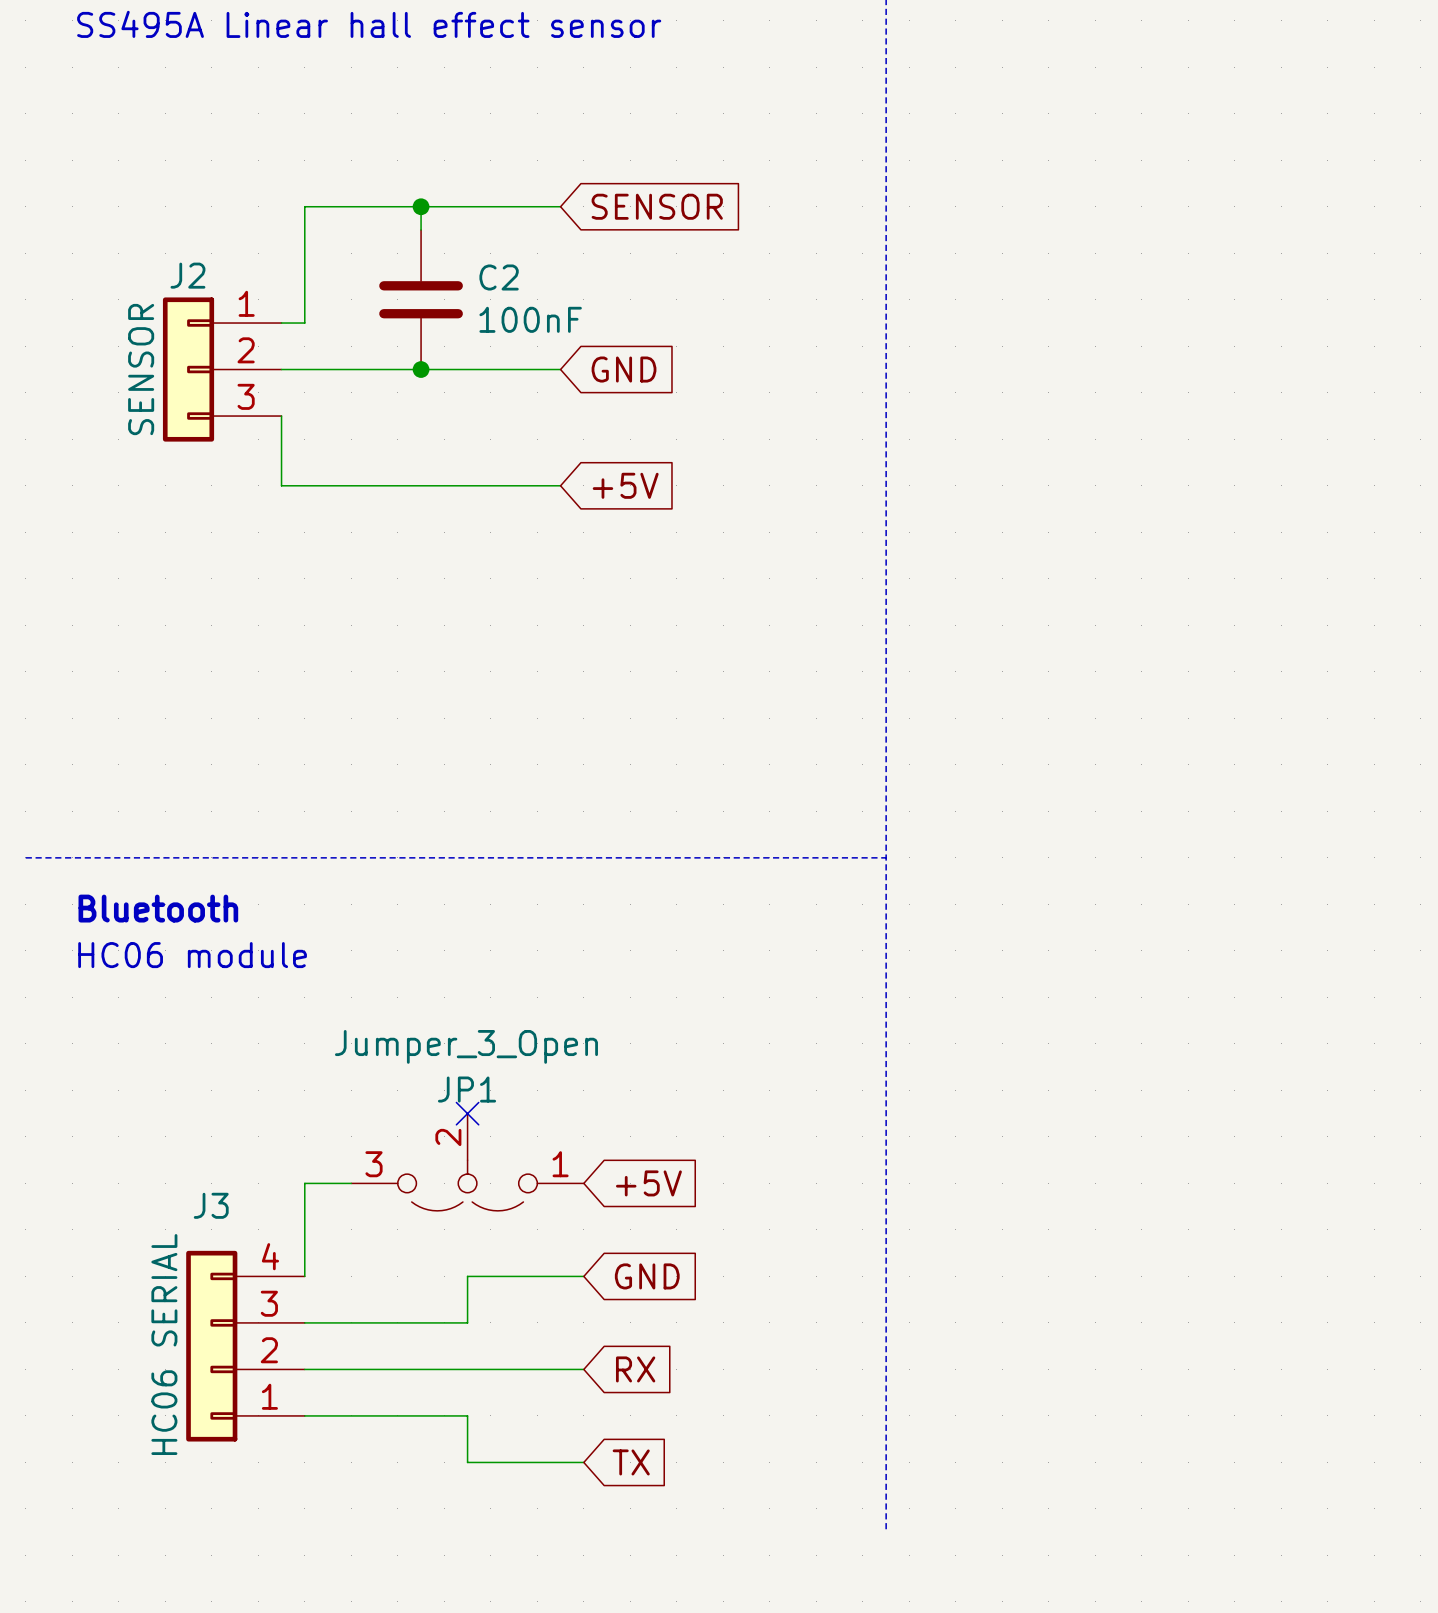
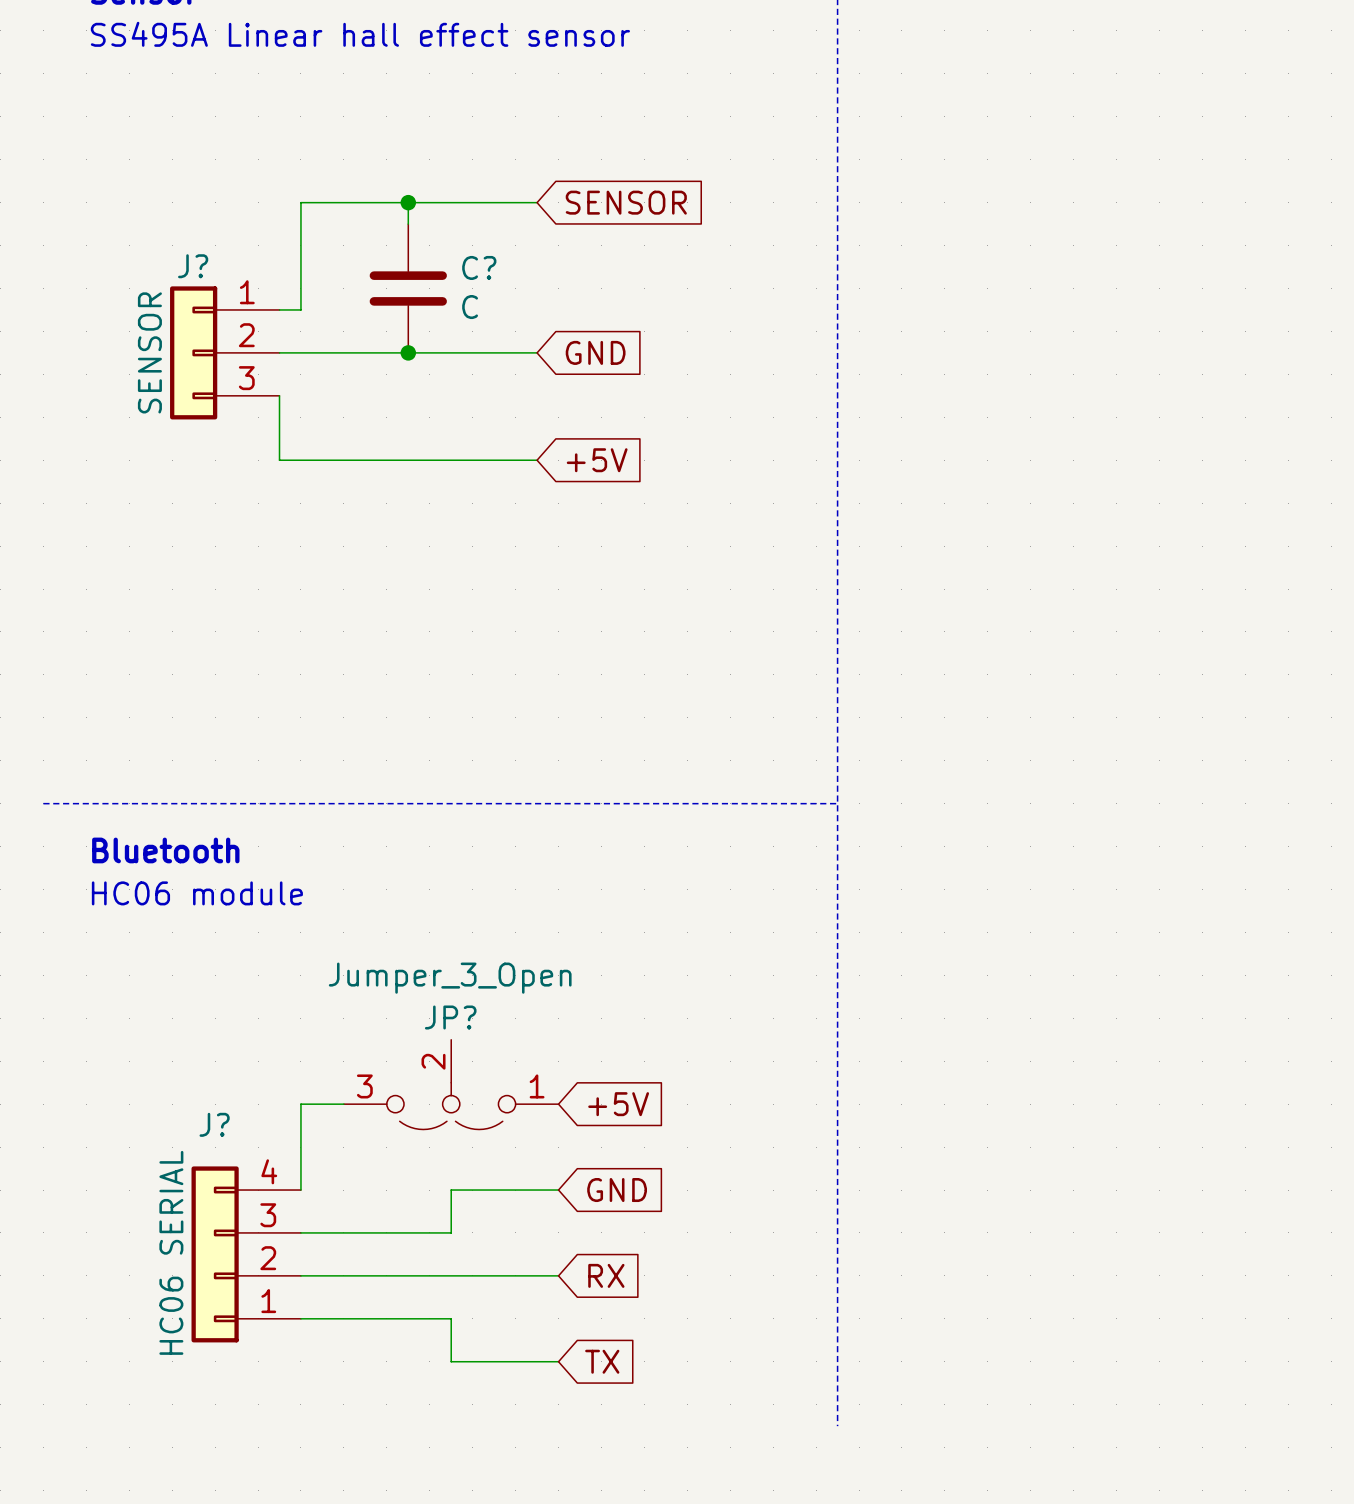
J2 name: J2 (187, 275) -> J? (193, 266)
C2 name: C2 (499, 277) -> C? (479, 267)
C2 value: 100nF (530, 319) -> C (470, 307)
JP1 name: JP1 (467, 1089) -> JP? (450, 1017)
no-connect mark: (467, 1113) -> none
J3 name: J3 (211, 1205) -> J? (214, 1124)

